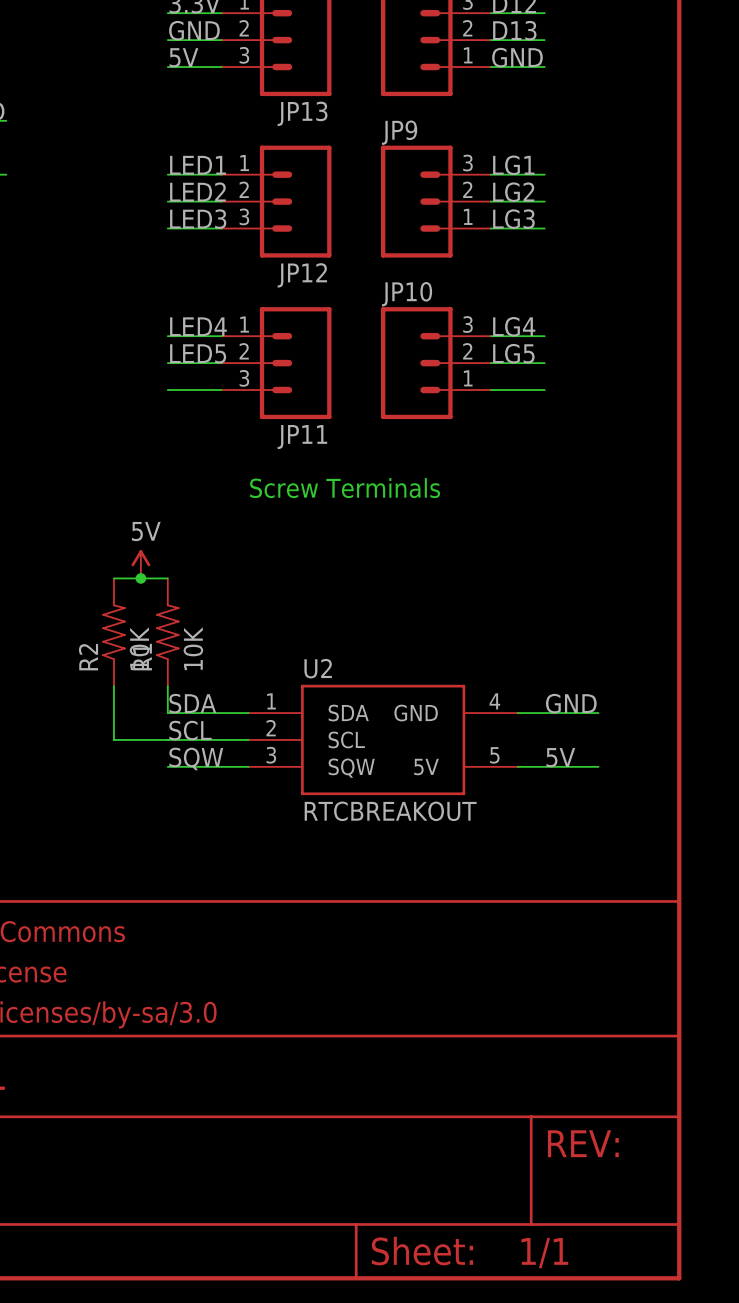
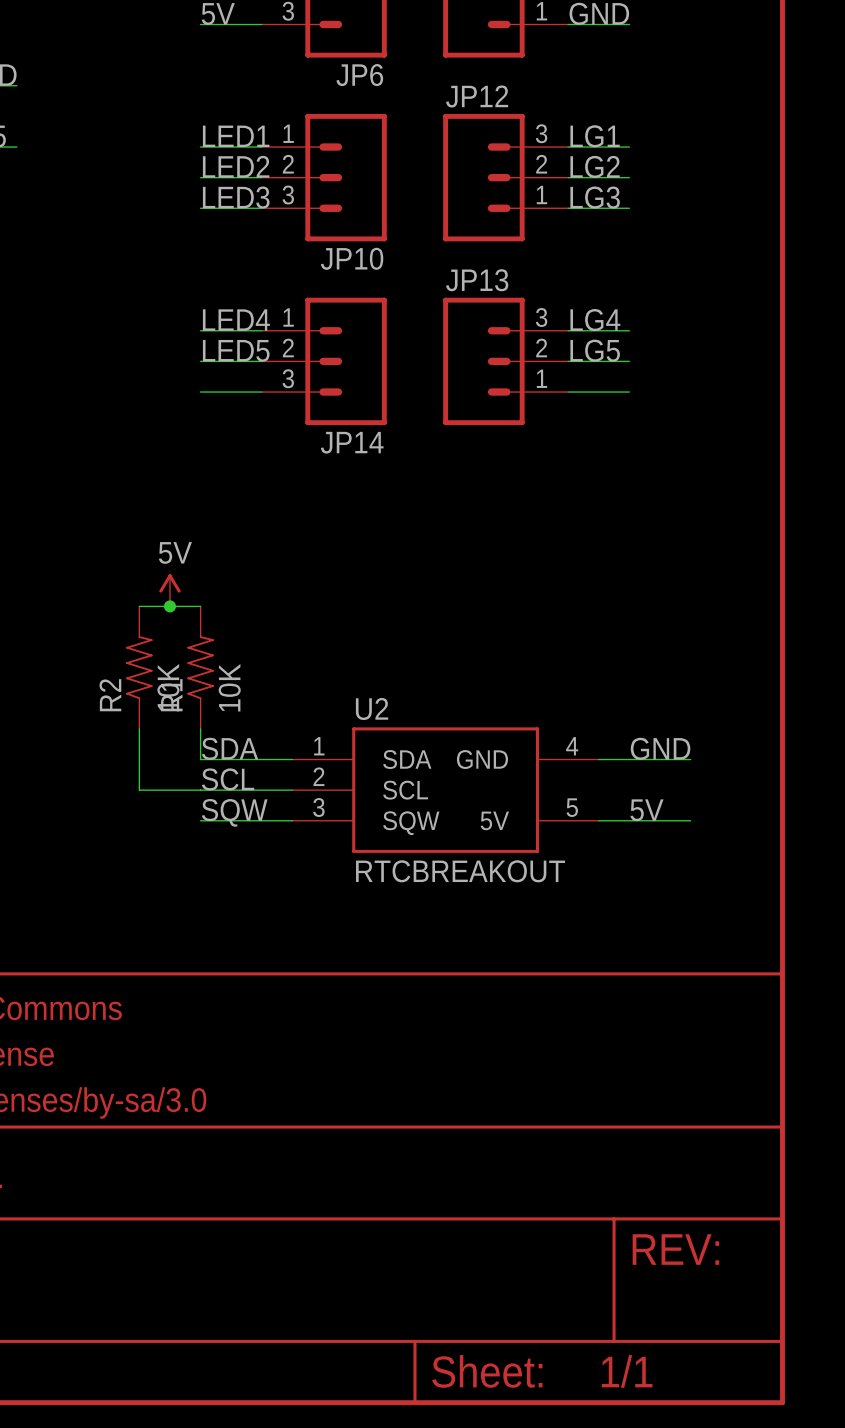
JP13 name: JP13 (302, 113) -> JP6 (359, 75)
JP9 name: JP9 (399, 132) -> JP12 (477, 96)
JP12 name: JP12 (302, 275) -> JP10 (352, 258)
JP10 name: JP10 (407, 294) -> JP13 (477, 280)
JP11 name: JP11 (302, 437) -> JP14 (352, 442)
text: Screw Terminals (345, 488) -> none

